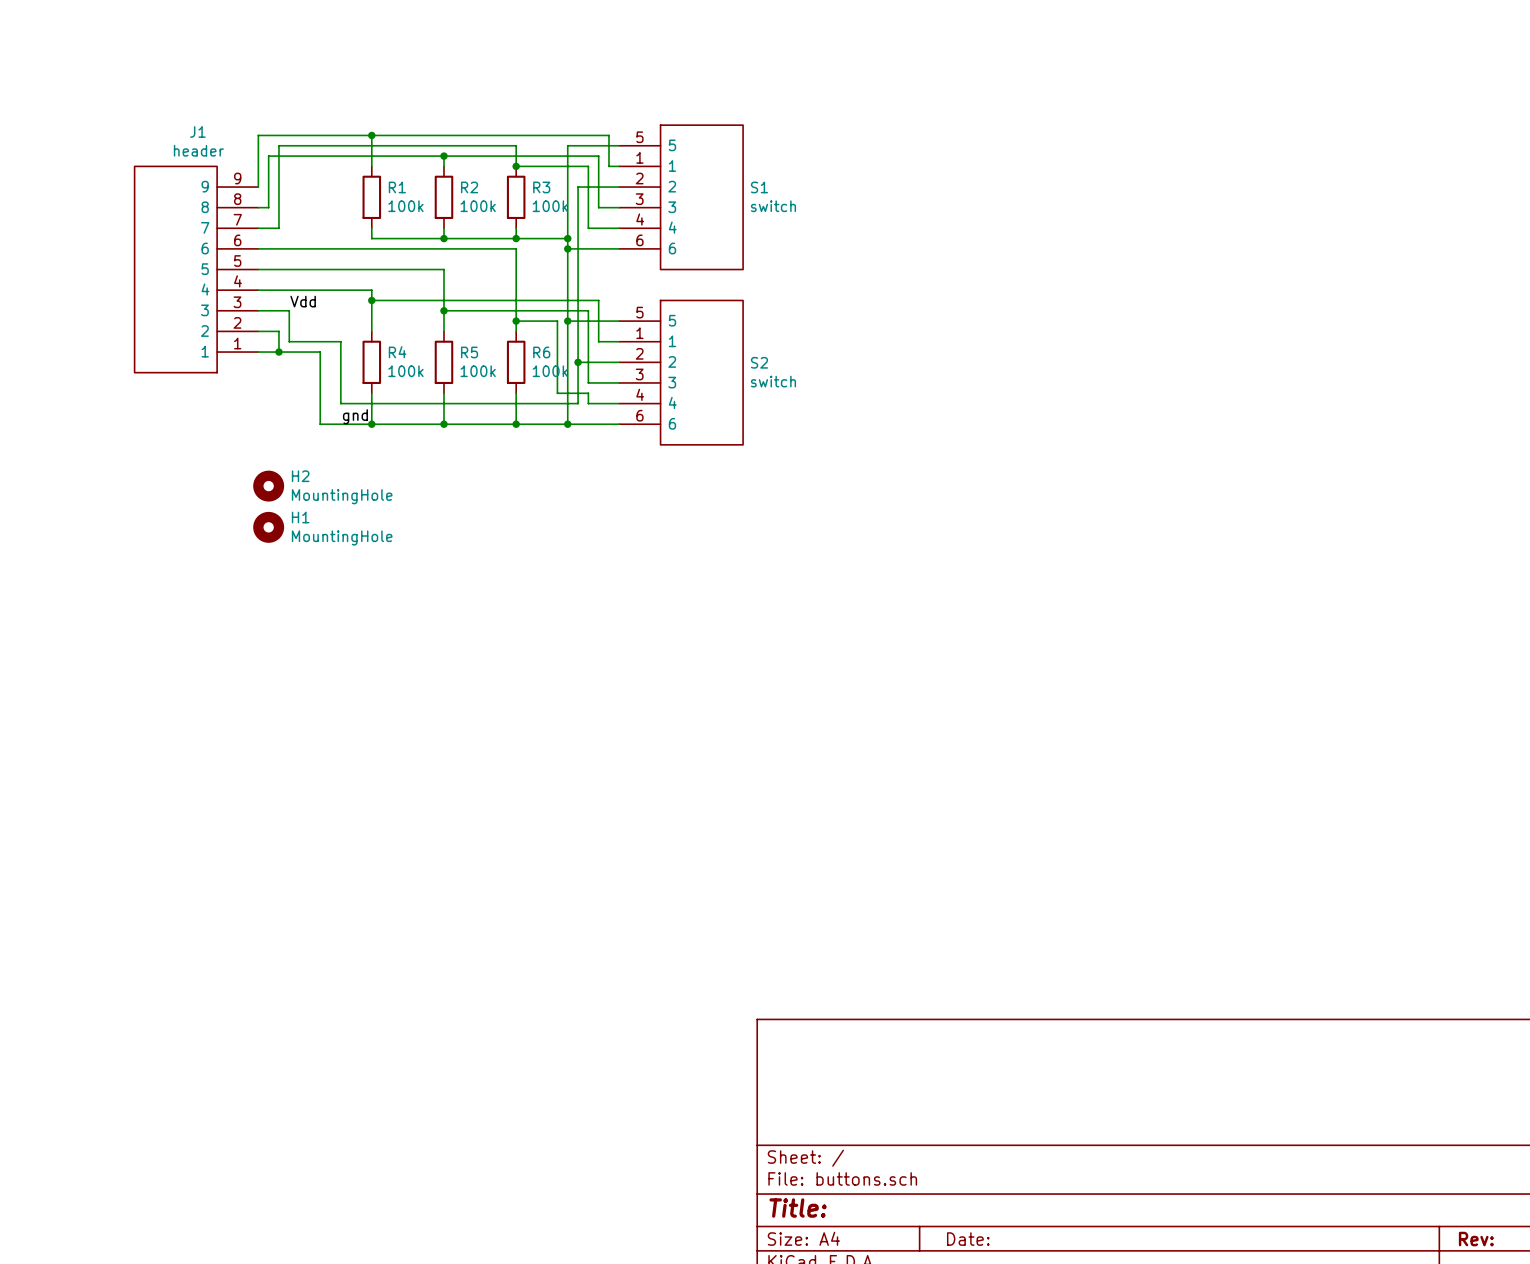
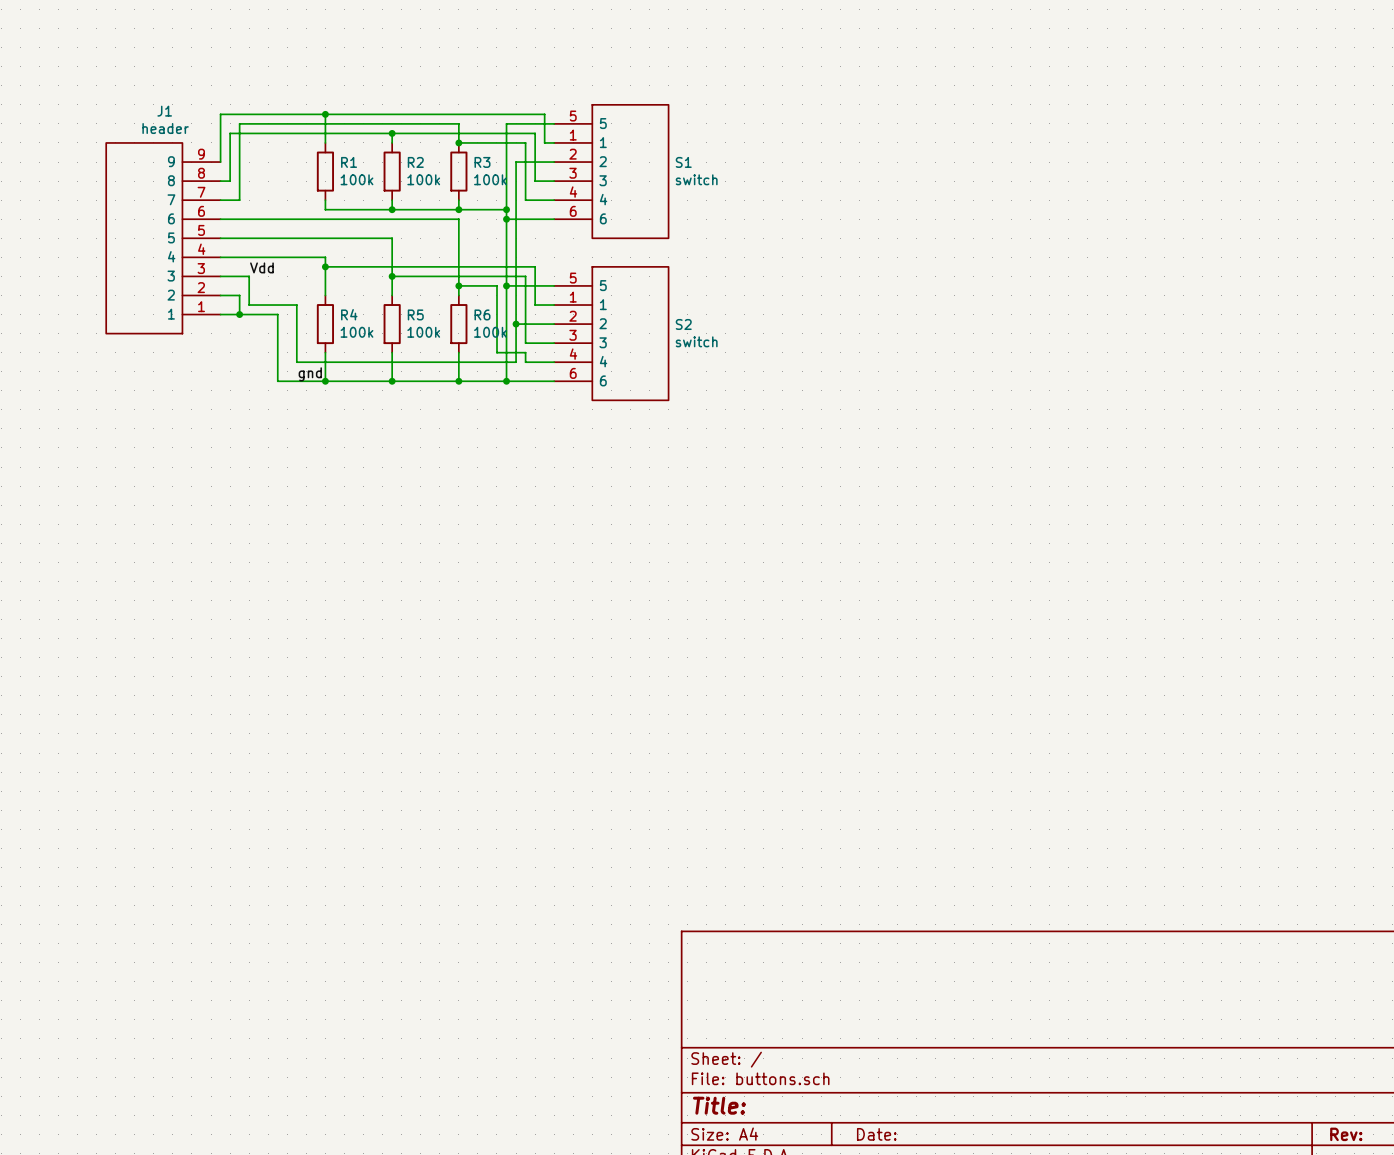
H2: MountingHole (268, 486) -> none
H1: MountingHole (268, 527) -> none

